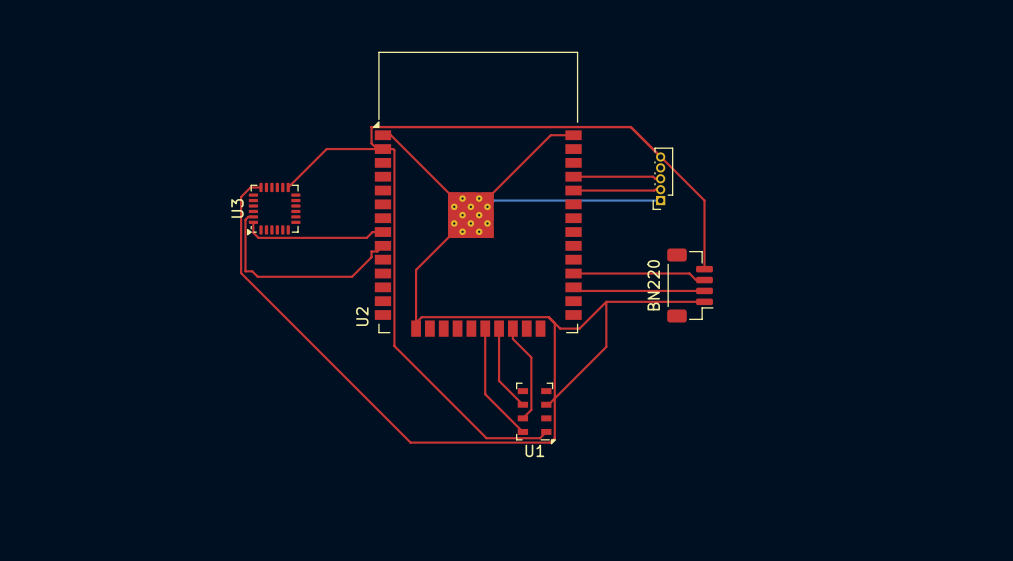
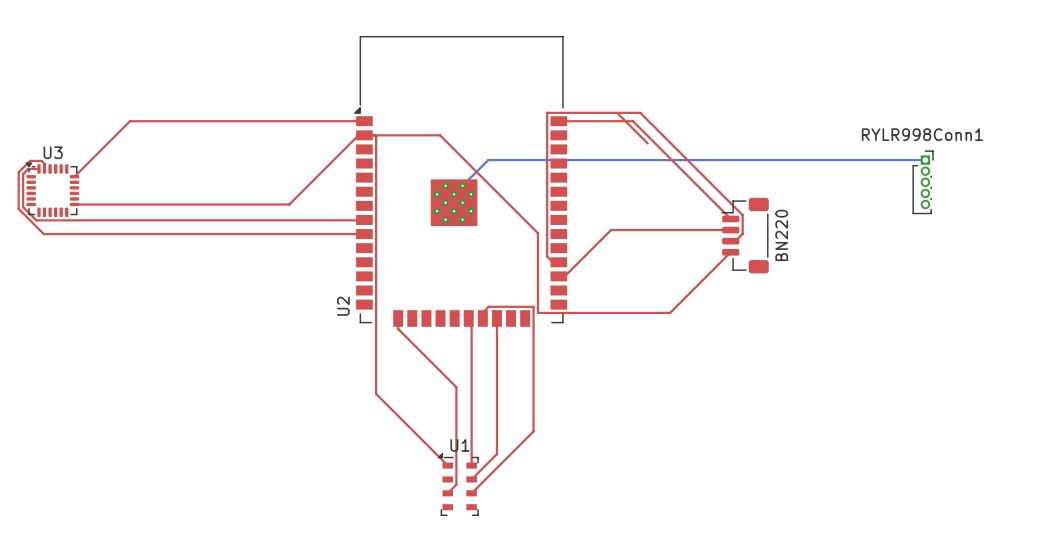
top track: (562, 127) (371, 127) (371, 143) (377, 149) (326, 149) (288, 187) -> (547, 112) (547, 256) (552, 262)
top track: (630, 127) (704, 200) (704, 269) -> (617, 112) (640, 112) (742, 215) (742, 233) (735, 241) (730, 241)
top track: (382, 135) (390, 135) (454, 198) -> (364, 121) (130, 121) (74, 176)
top track: (573, 135) (550, 135) (487, 198) -> (558, 121) (632, 121) (730, 218)
top track: none -> (358, 135) (289, 204) (232, 204)
top track: none -> (375, 135) (440, 135) (537, 233) (537, 312) (670, 312) (730, 252)
bottom track: none -> (925, 160) (488, 160) (462, 185)
top track: (573, 176) (653, 176) (660, 178) -> none
part: (662, 178) -> none
top track: none -> (38, 168) (28, 168) (23, 174) (23, 207) (36, 220) (364, 220)
top track: (261, 187) (250, 187) (241, 196) (241, 273) (410, 442) (550, 442) (554, 438) (554, 323) -> none
top track: (660, 189) (573, 190) -> none
RYLR998Conn1: none -> (923, 182)
bottom track: (660, 200) (493, 200) (487, 206) -> none
U3 rotation: 0° (273, 209) -> 90° clockwise (52, 189)
U3 position: (273, 209) -> (52, 189)
top track: none -> (74, 204) (227, 204)
top track: (248, 216) (245, 219) (245, 271) (252, 271) (257, 276) (352, 276) (371, 257) (371, 251) (377, 251) (382, 245) -> (44, 168) (44, 163) (41, 160) (30, 160) (18, 172) (18, 208) (43, 234) (364, 234)
top track: (253, 222) (253, 232) (258, 237) (366, 237) (372, 232) (382, 232) -> none
top track: (454, 231) (416, 269) (416, 328) -> (447, 493) (456, 484) (456, 387) (398, 329) (398, 318)
top track: none -> (730, 230) (611, 230) (564, 276)
top track: (573, 273) (689, 273) (696, 280) (704, 280) -> none
BN220 rotation: 0° (690, 285) -> 180° (745, 235)
BN220 position: (690, 285) -> (745, 235)
top track: (573, 287) (577, 290) (704, 290) -> none
top track: (606, 301) (579, 328) (560, 328) (548, 317) -> (471, 493) (533, 431) (533, 306)
top track: (606, 301) (704, 301) -> none
top track: (606, 301) (606, 346) (548, 404) (546, 404) -> none
top track: (504, 317) (421, 317) (416, 322) -> (488, 306) (482, 312)
top track: (485, 328) (485, 394) (522, 431) -> none
top track: (499, 328) (499, 380) (522, 404) -> none
top track: none -> (471, 321) (471, 465)
top track: (512, 338) (531, 357) (531, 409) (522, 418) -> (496, 329) (496, 454) (471, 479)
top track: (394, 346) (486, 438) (540, 438) (546, 431) -> (376, 336) (376, 393) (447, 465)
U1 rotation: 0° (536, 413) -> 180° (458, 484)
U1 position: (536, 413) -> (458, 484)

